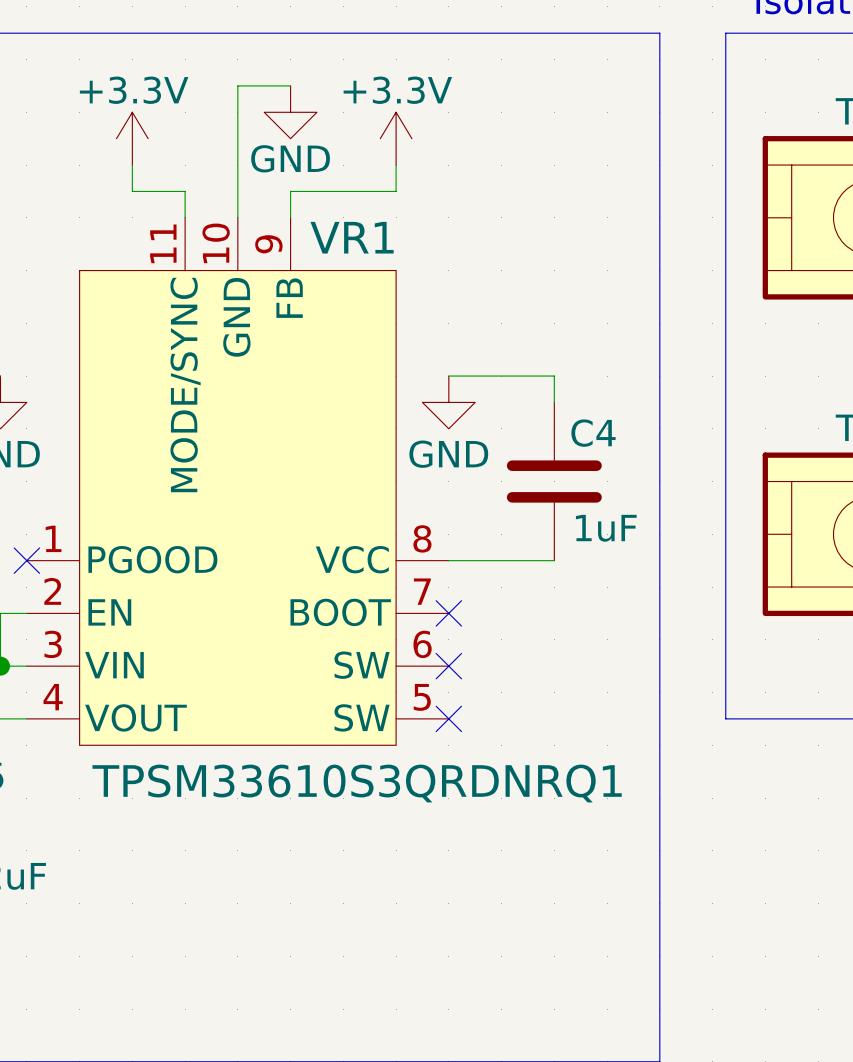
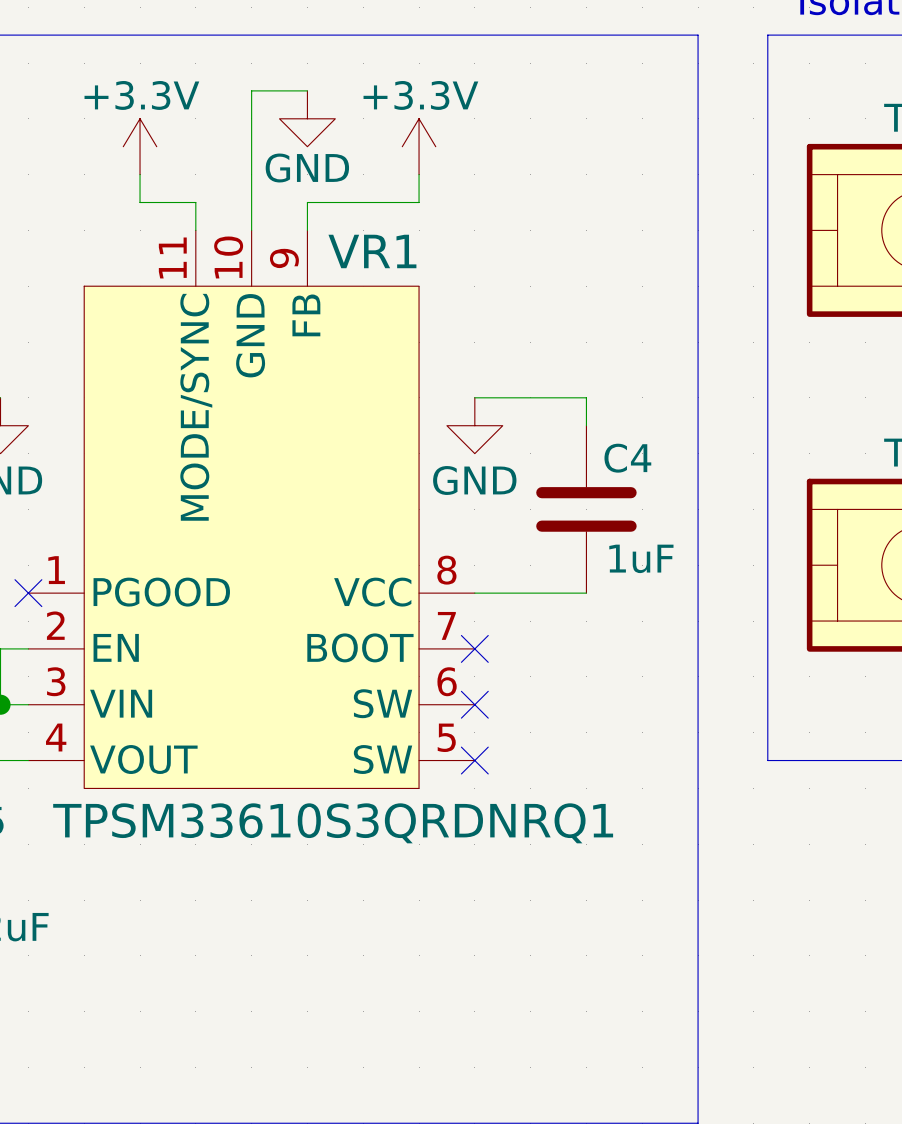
VR1 value position: TPSM33610S3QRDNRQ1 (357, 783) -> TPSM33610S3QRDNRQ1 (333, 823)

